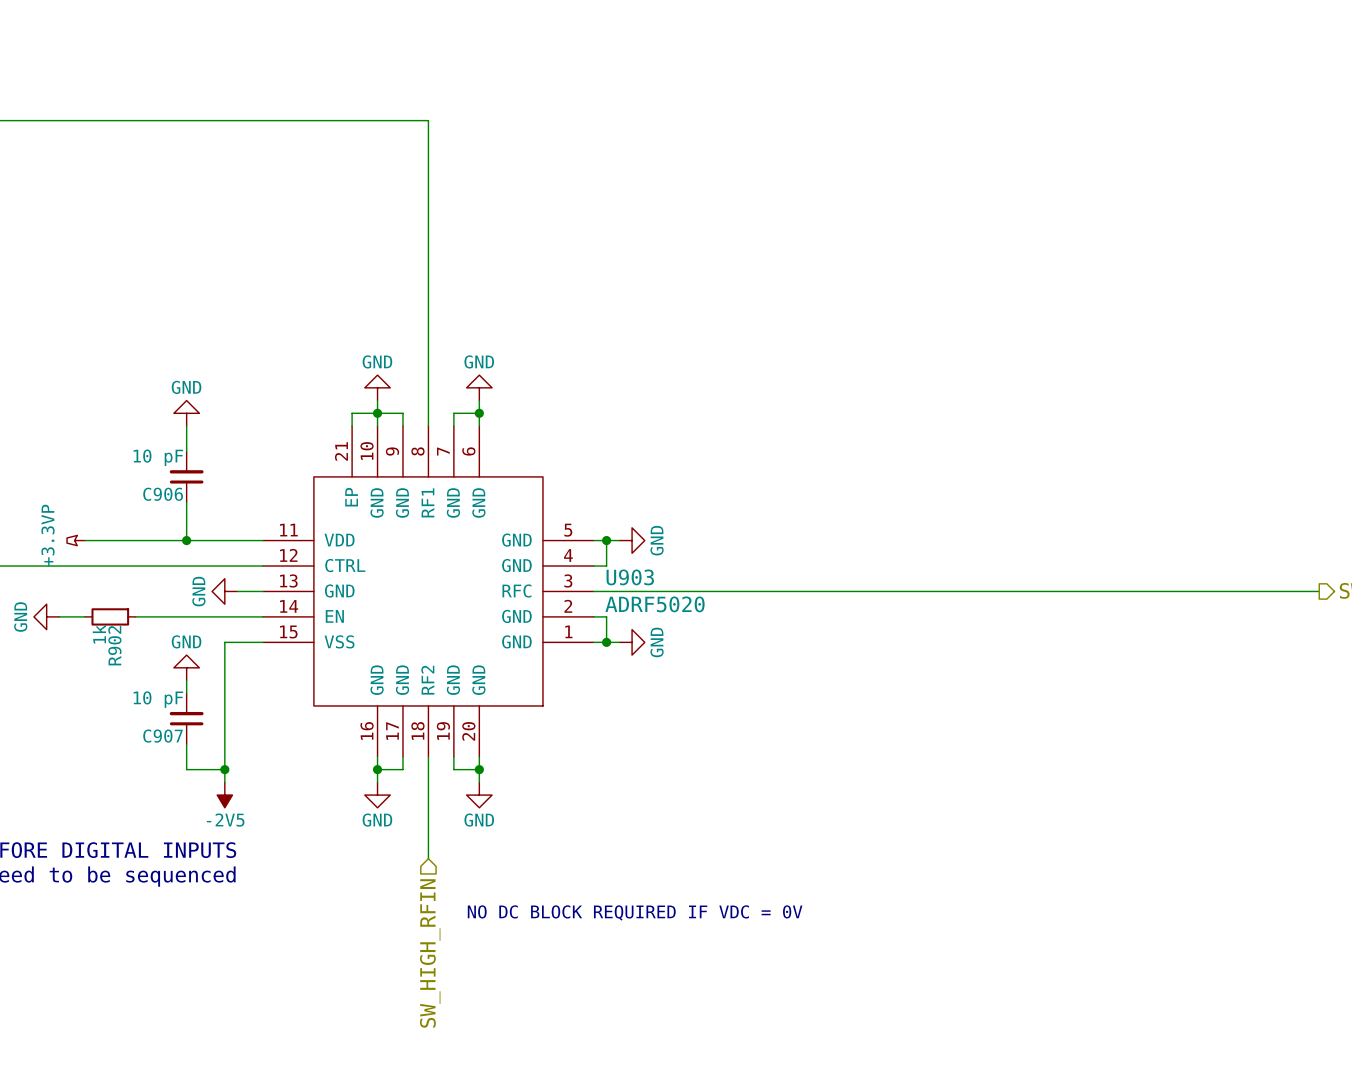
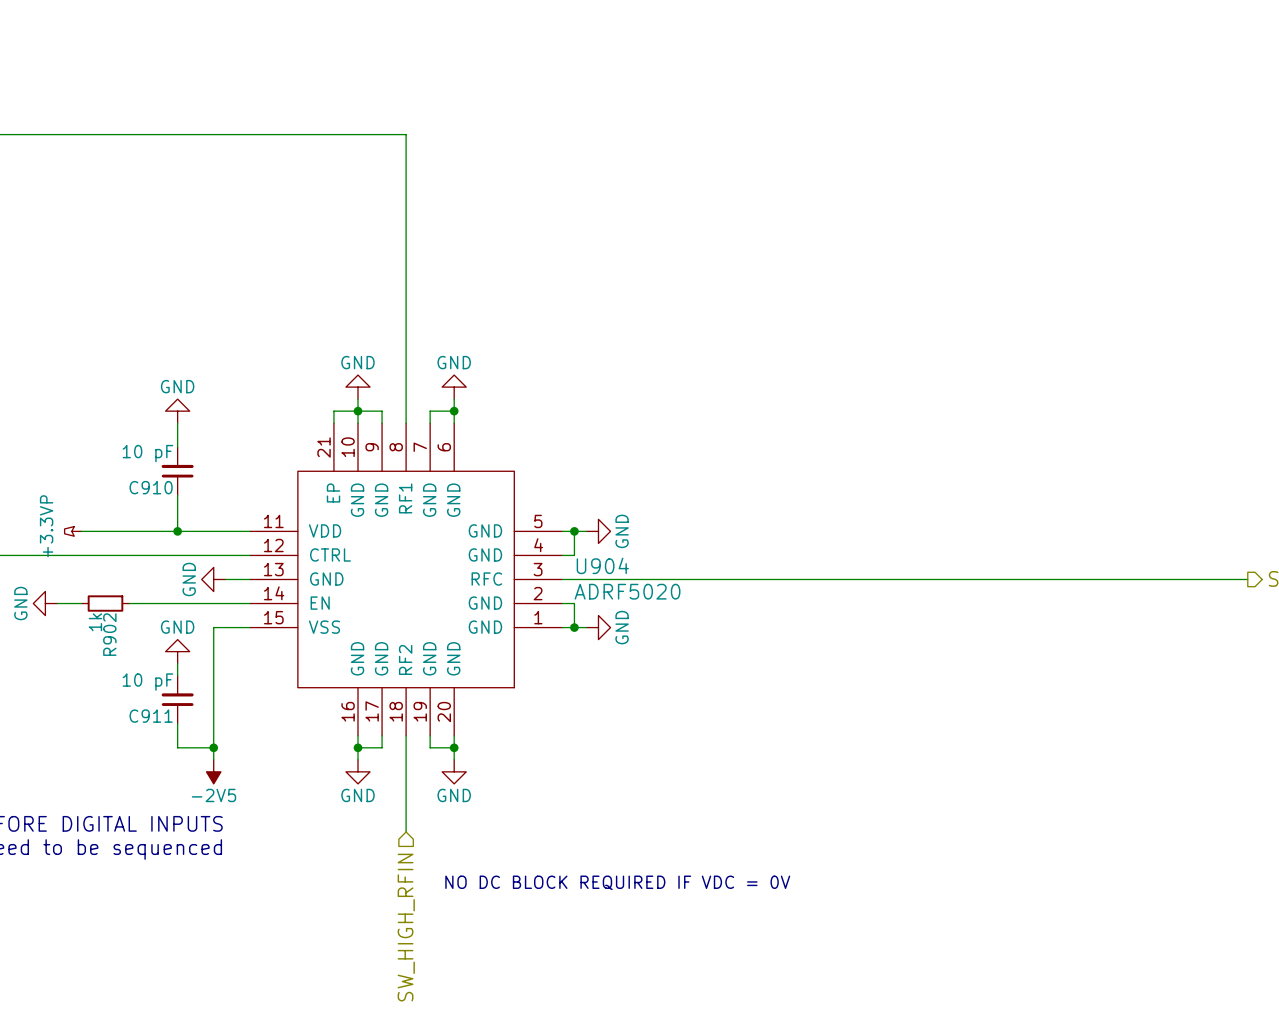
C906 name: C906 (163, 494) -> C910 (151, 487)
U903 name: U903 (630, 577) -> U904 (602, 565)
C907 name: C907 (163, 736) -> C911 (151, 716)

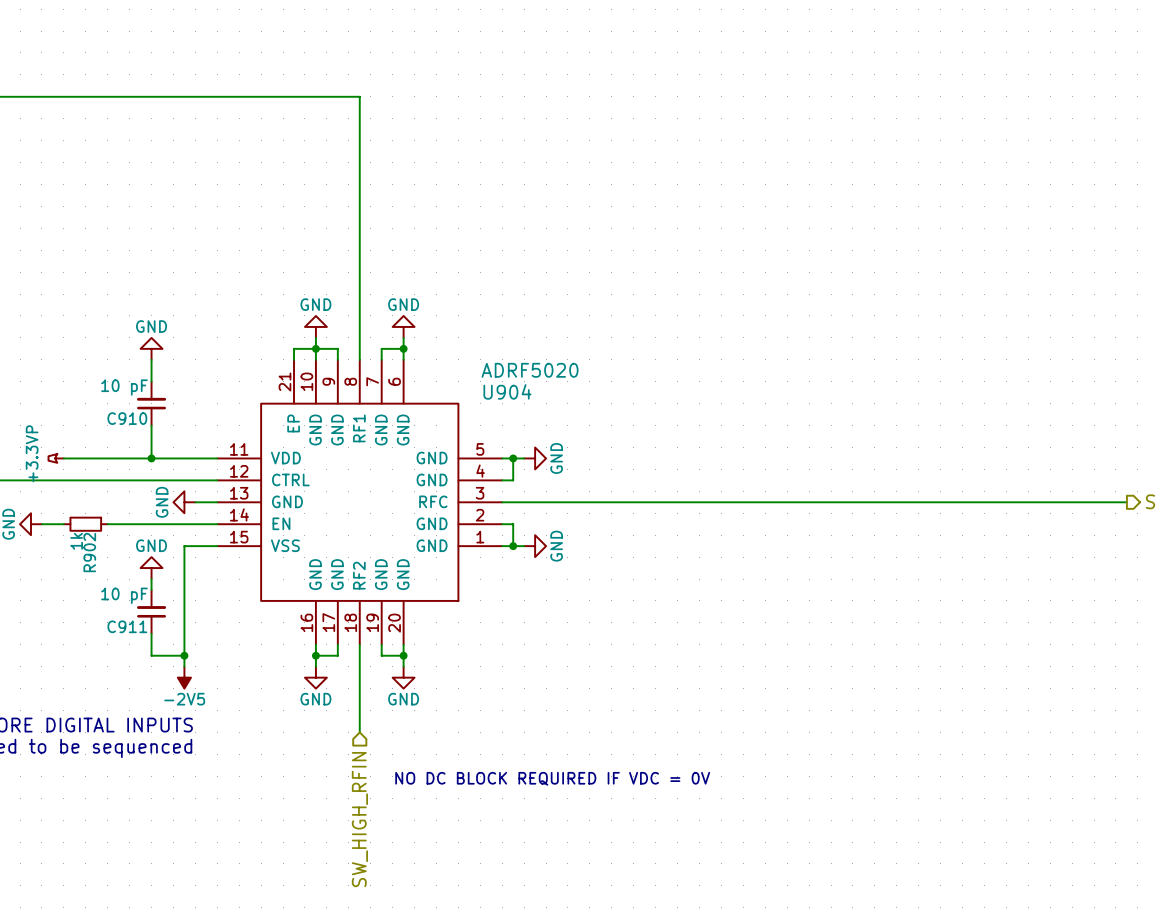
U904 name position: U904 (602, 565) -> U904 (507, 391)
U904 value position: ADRF5020 (627, 591) -> ADRF5020 (530, 370)

